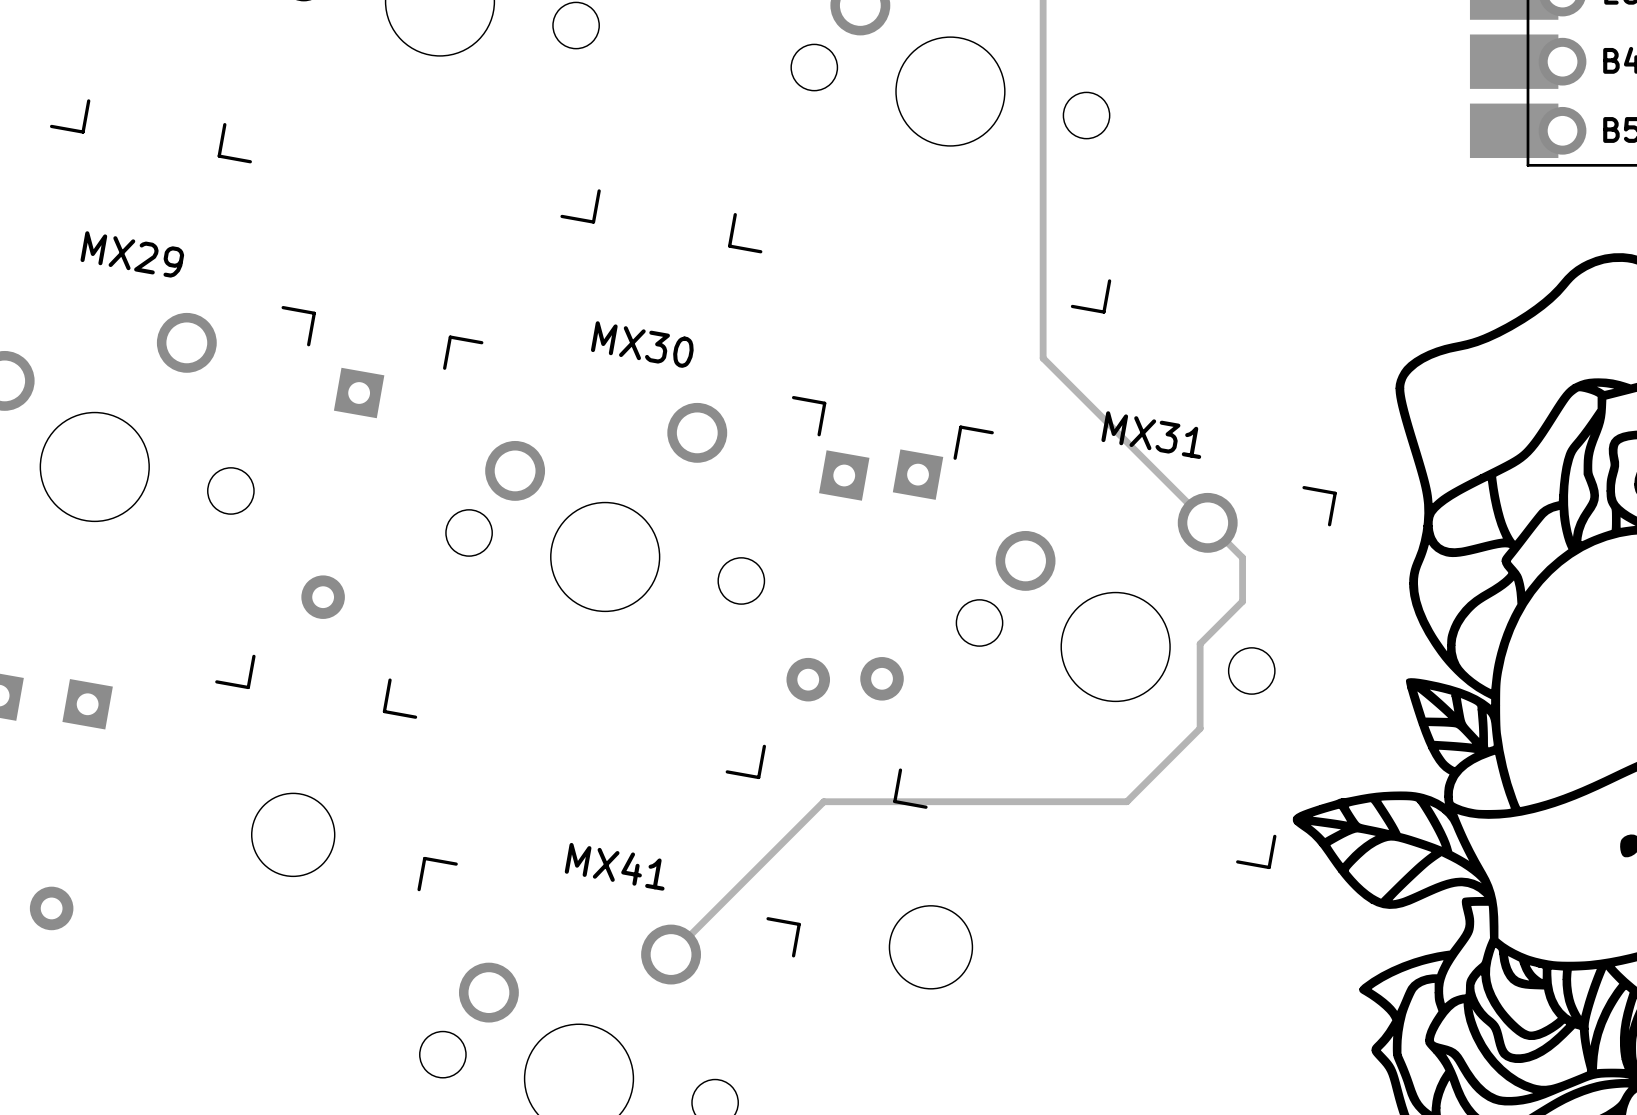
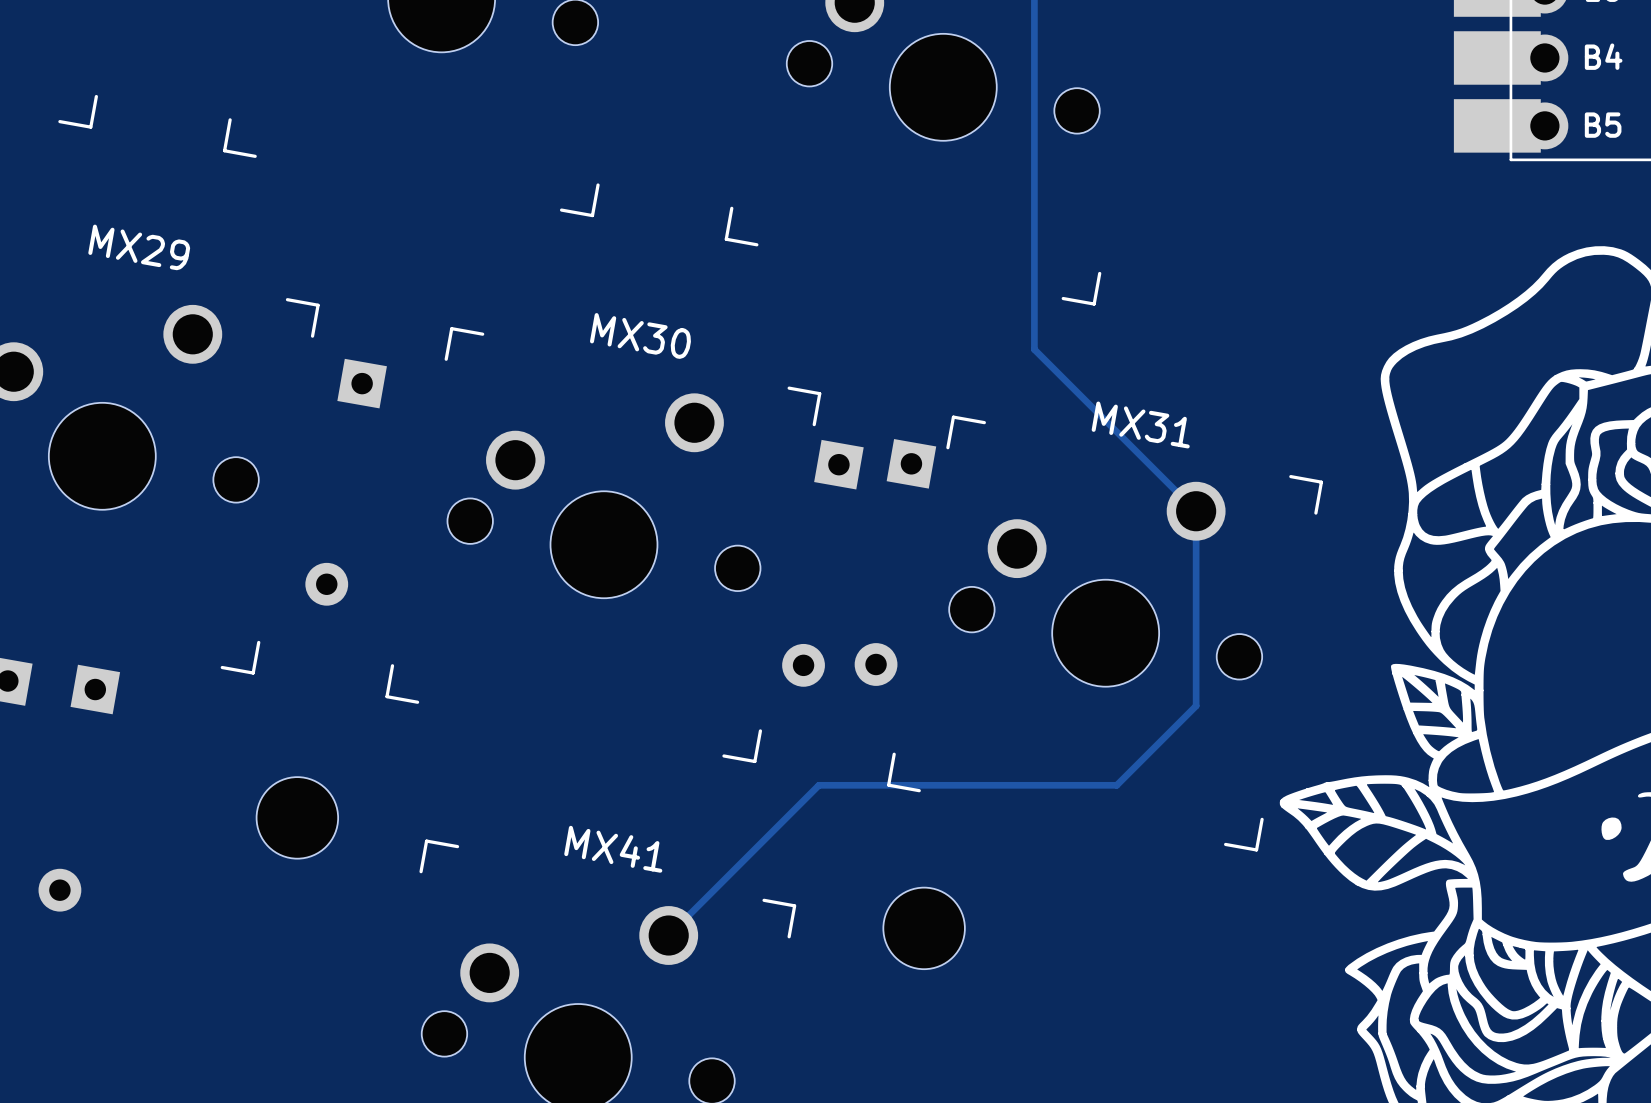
track: (1207, 522) (1242, 557) (1242, 601) (1200, 643) (1200, 728) -> (1196, 511) (1196, 705) (1188, 713)

